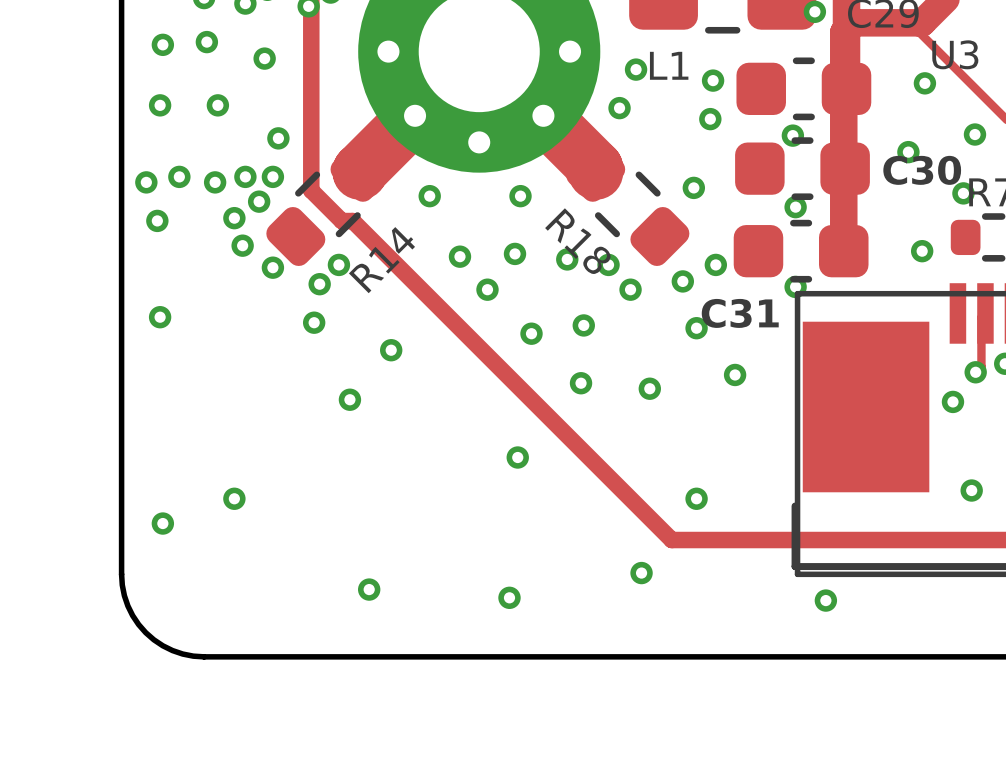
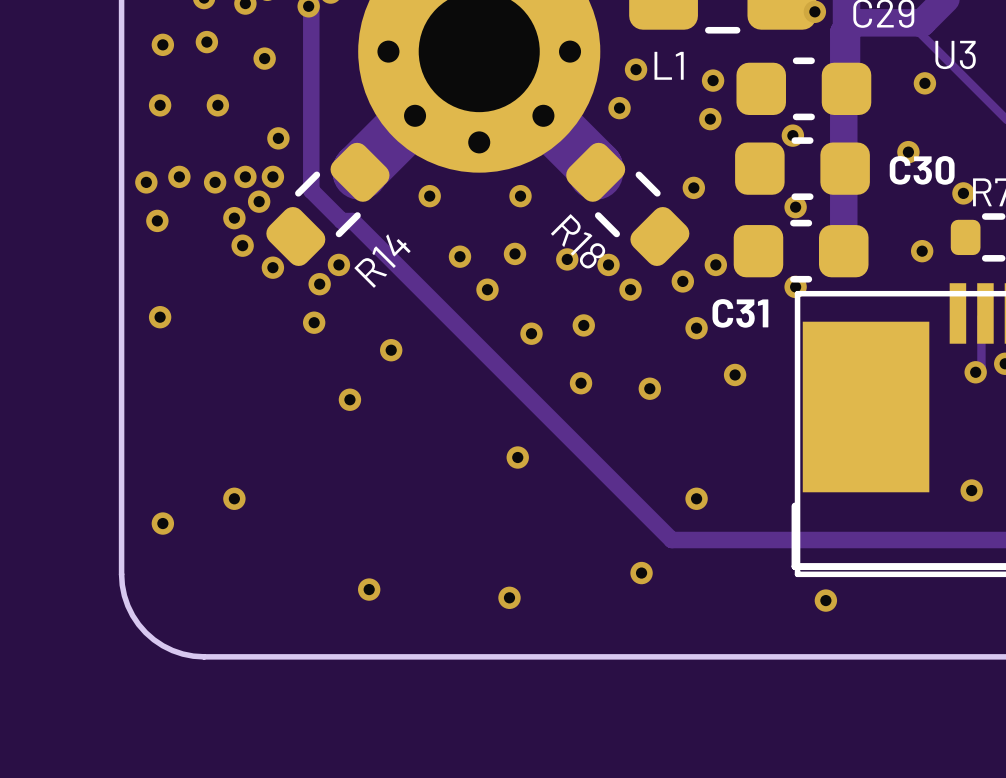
via: (974, 134) -> none
via: (952, 401) -> none

